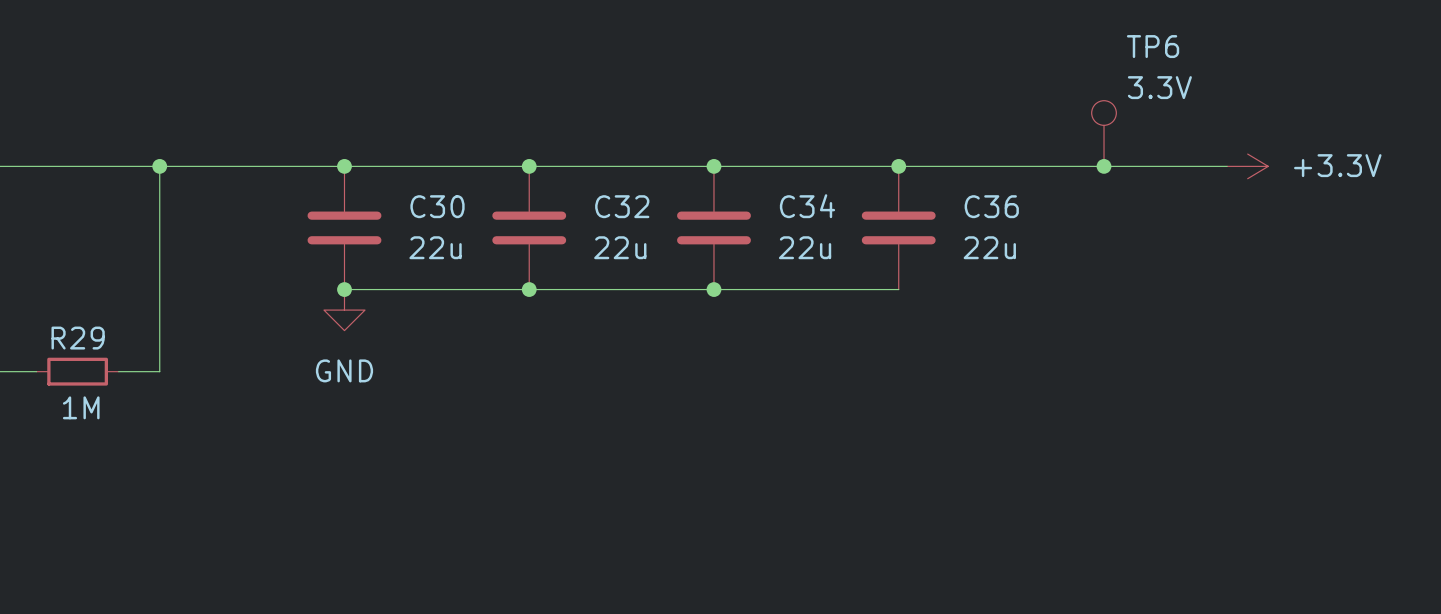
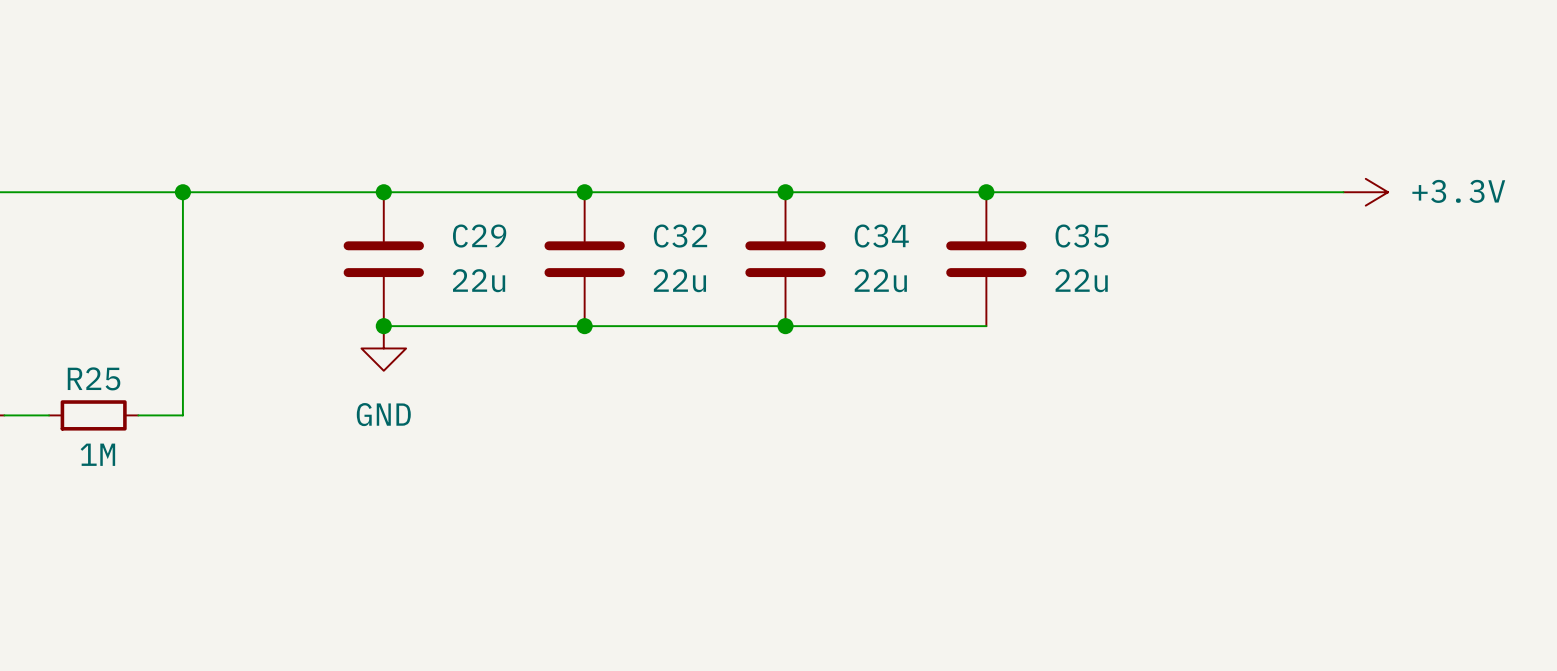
TP6: 3.3V (1104, 133) -> none
junction: (1104, 166) -> none
C30 name: C30 (437, 206) -> C29 (479, 236)
C36 name: C36 (991, 206) -> C35 (1082, 236)
R29 name: R29 (78, 338) -> R25 (94, 378)

